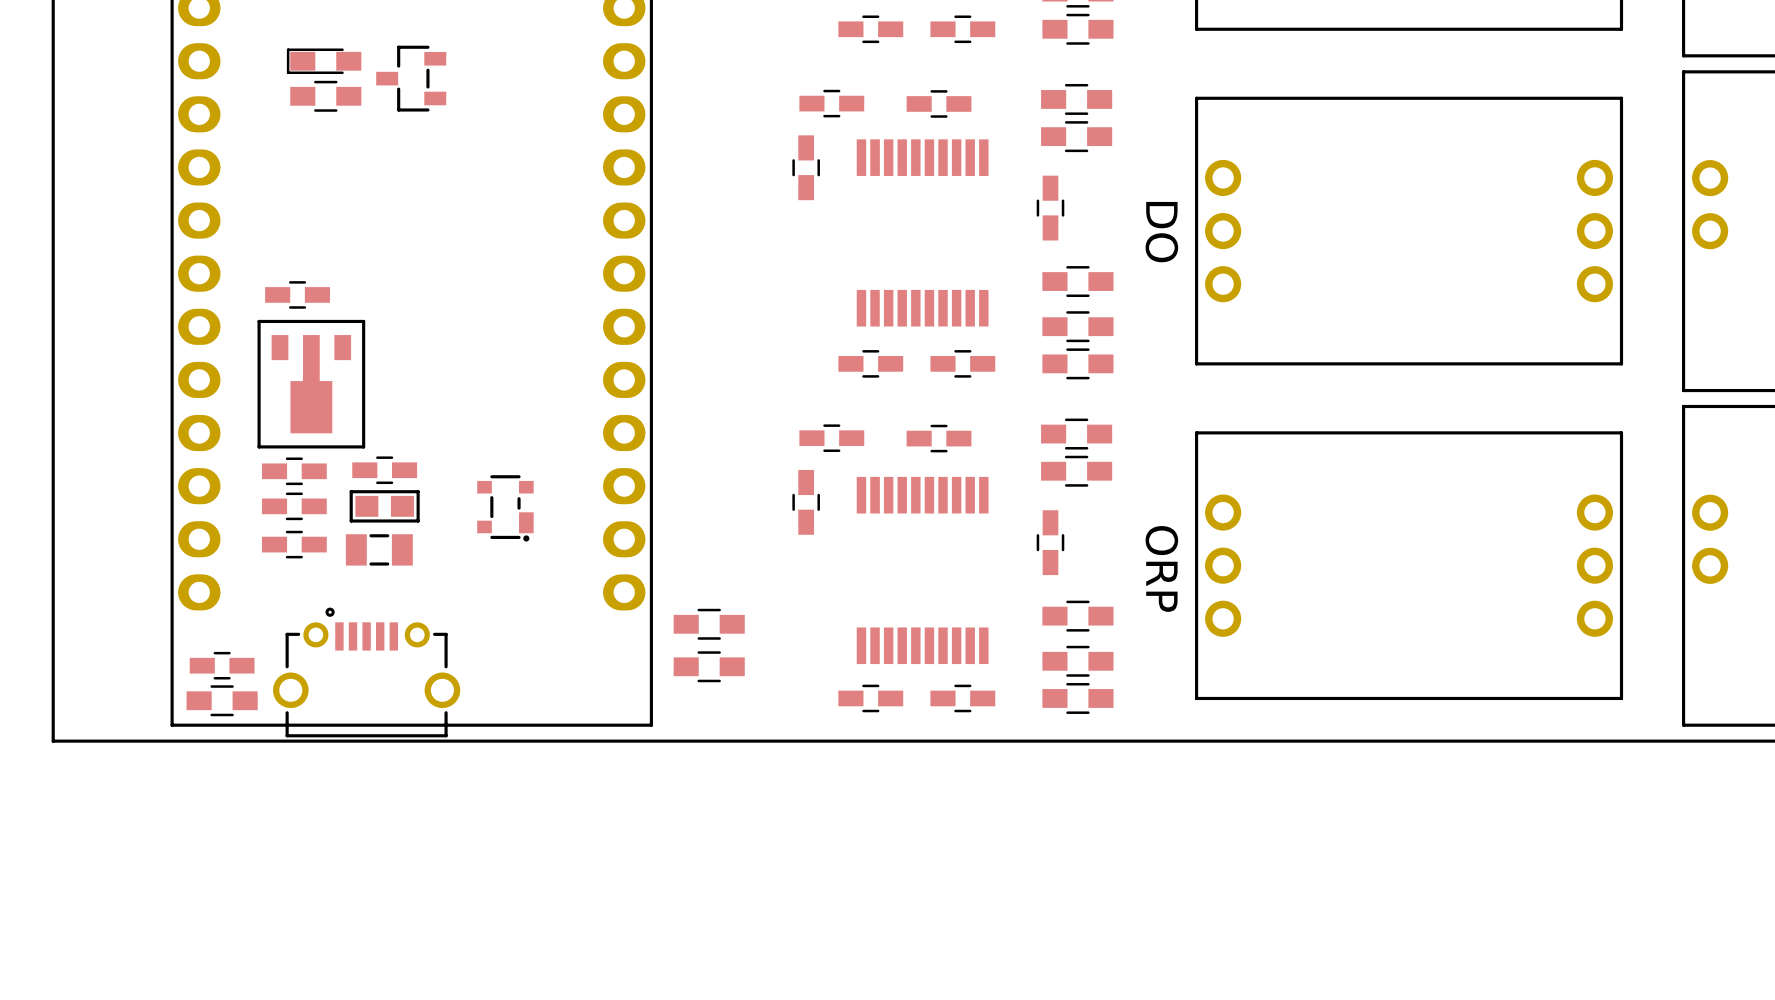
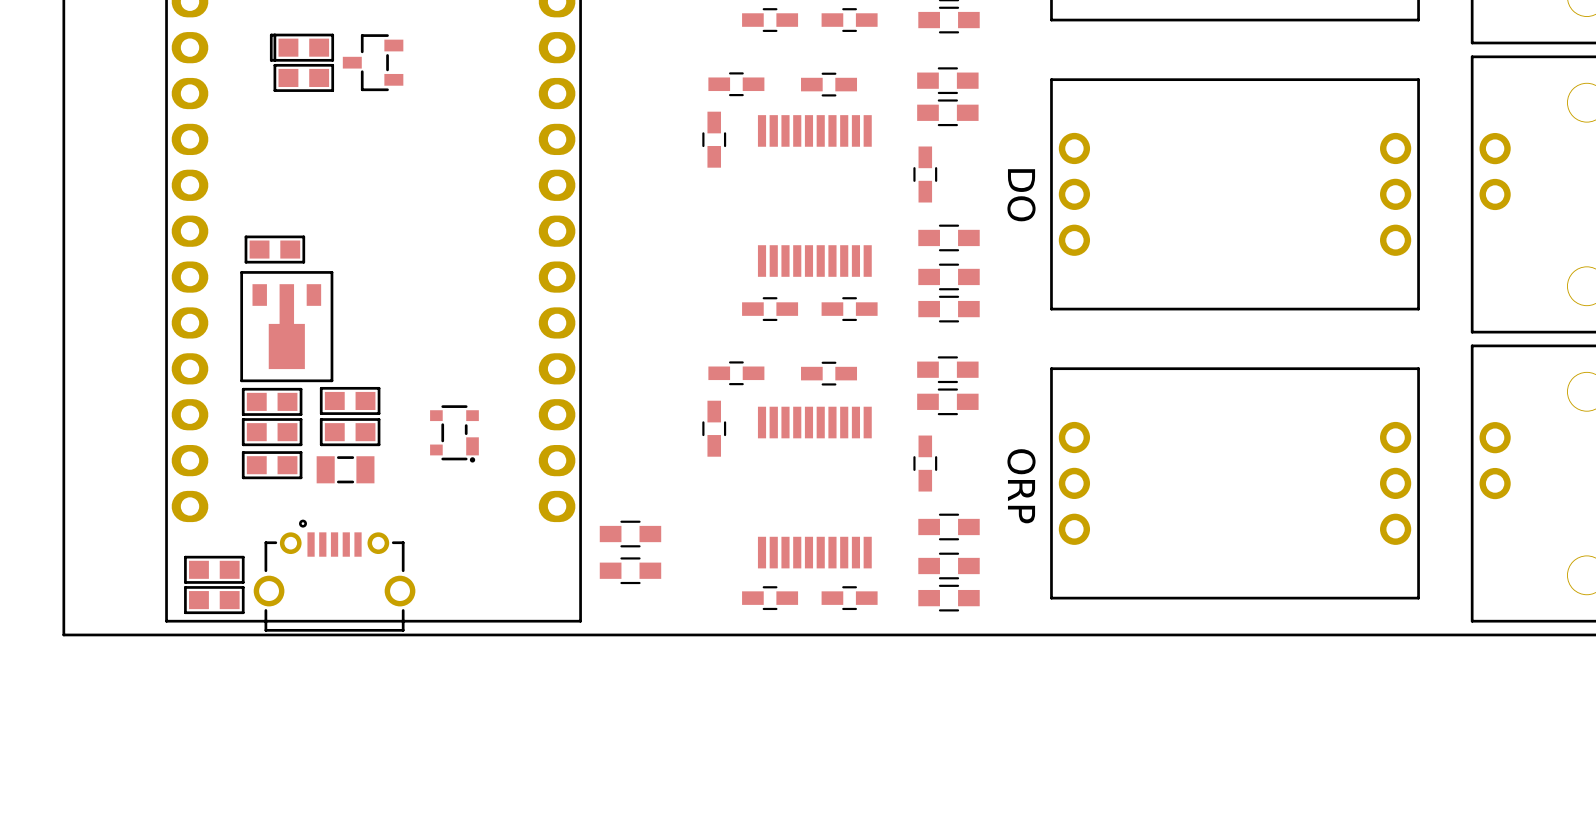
part footprint: [286, 48, 362, 75] -> [269, 33, 335, 62]
part footprint: [290, 80, 362, 112] -> [273, 63, 335, 92]
part footprint: [265, 281, 330, 309] -> [244, 235, 306, 264]
part footprint: [352, 456, 418, 485] -> [319, 386, 381, 415]
part footprint: [261, 457, 327, 486] -> [241, 387, 303, 416]
part footprint: [261, 492, 327, 521] -> [241, 418, 303, 447]
part footprint: [261, 530, 327, 559] -> [241, 451, 303, 480]
part footprint: [189, 651, 255, 680] -> [184, 555, 245, 584]
part footprint: [186, 685, 258, 717] -> [184, 586, 245, 615]

